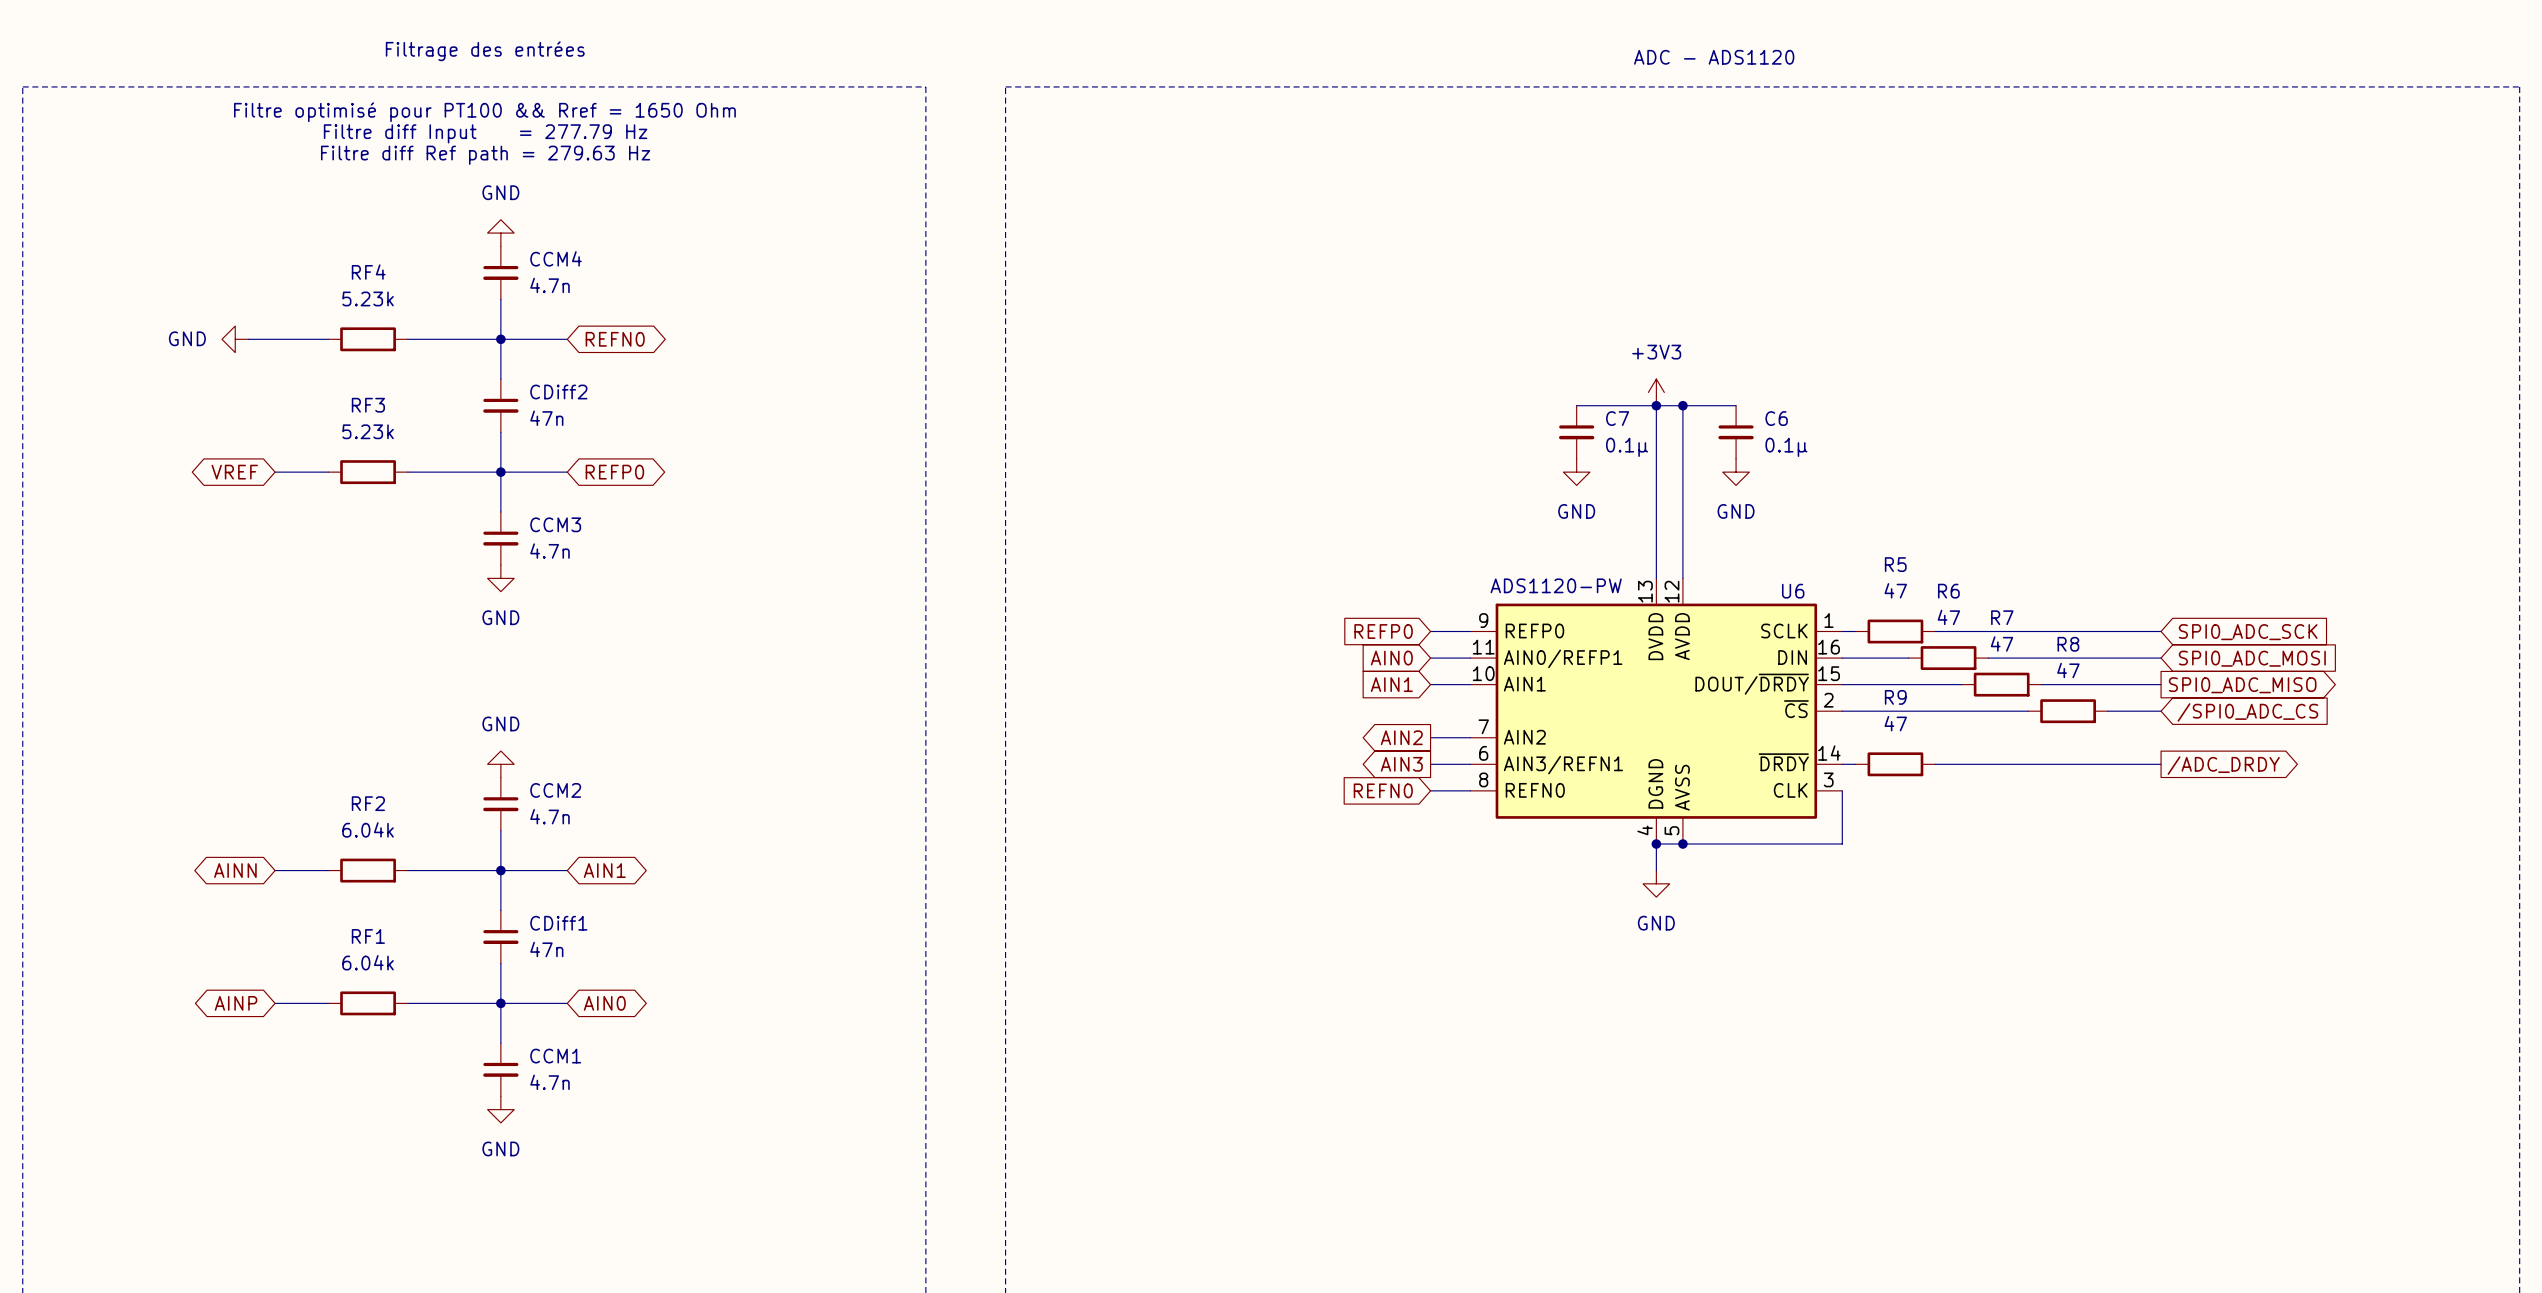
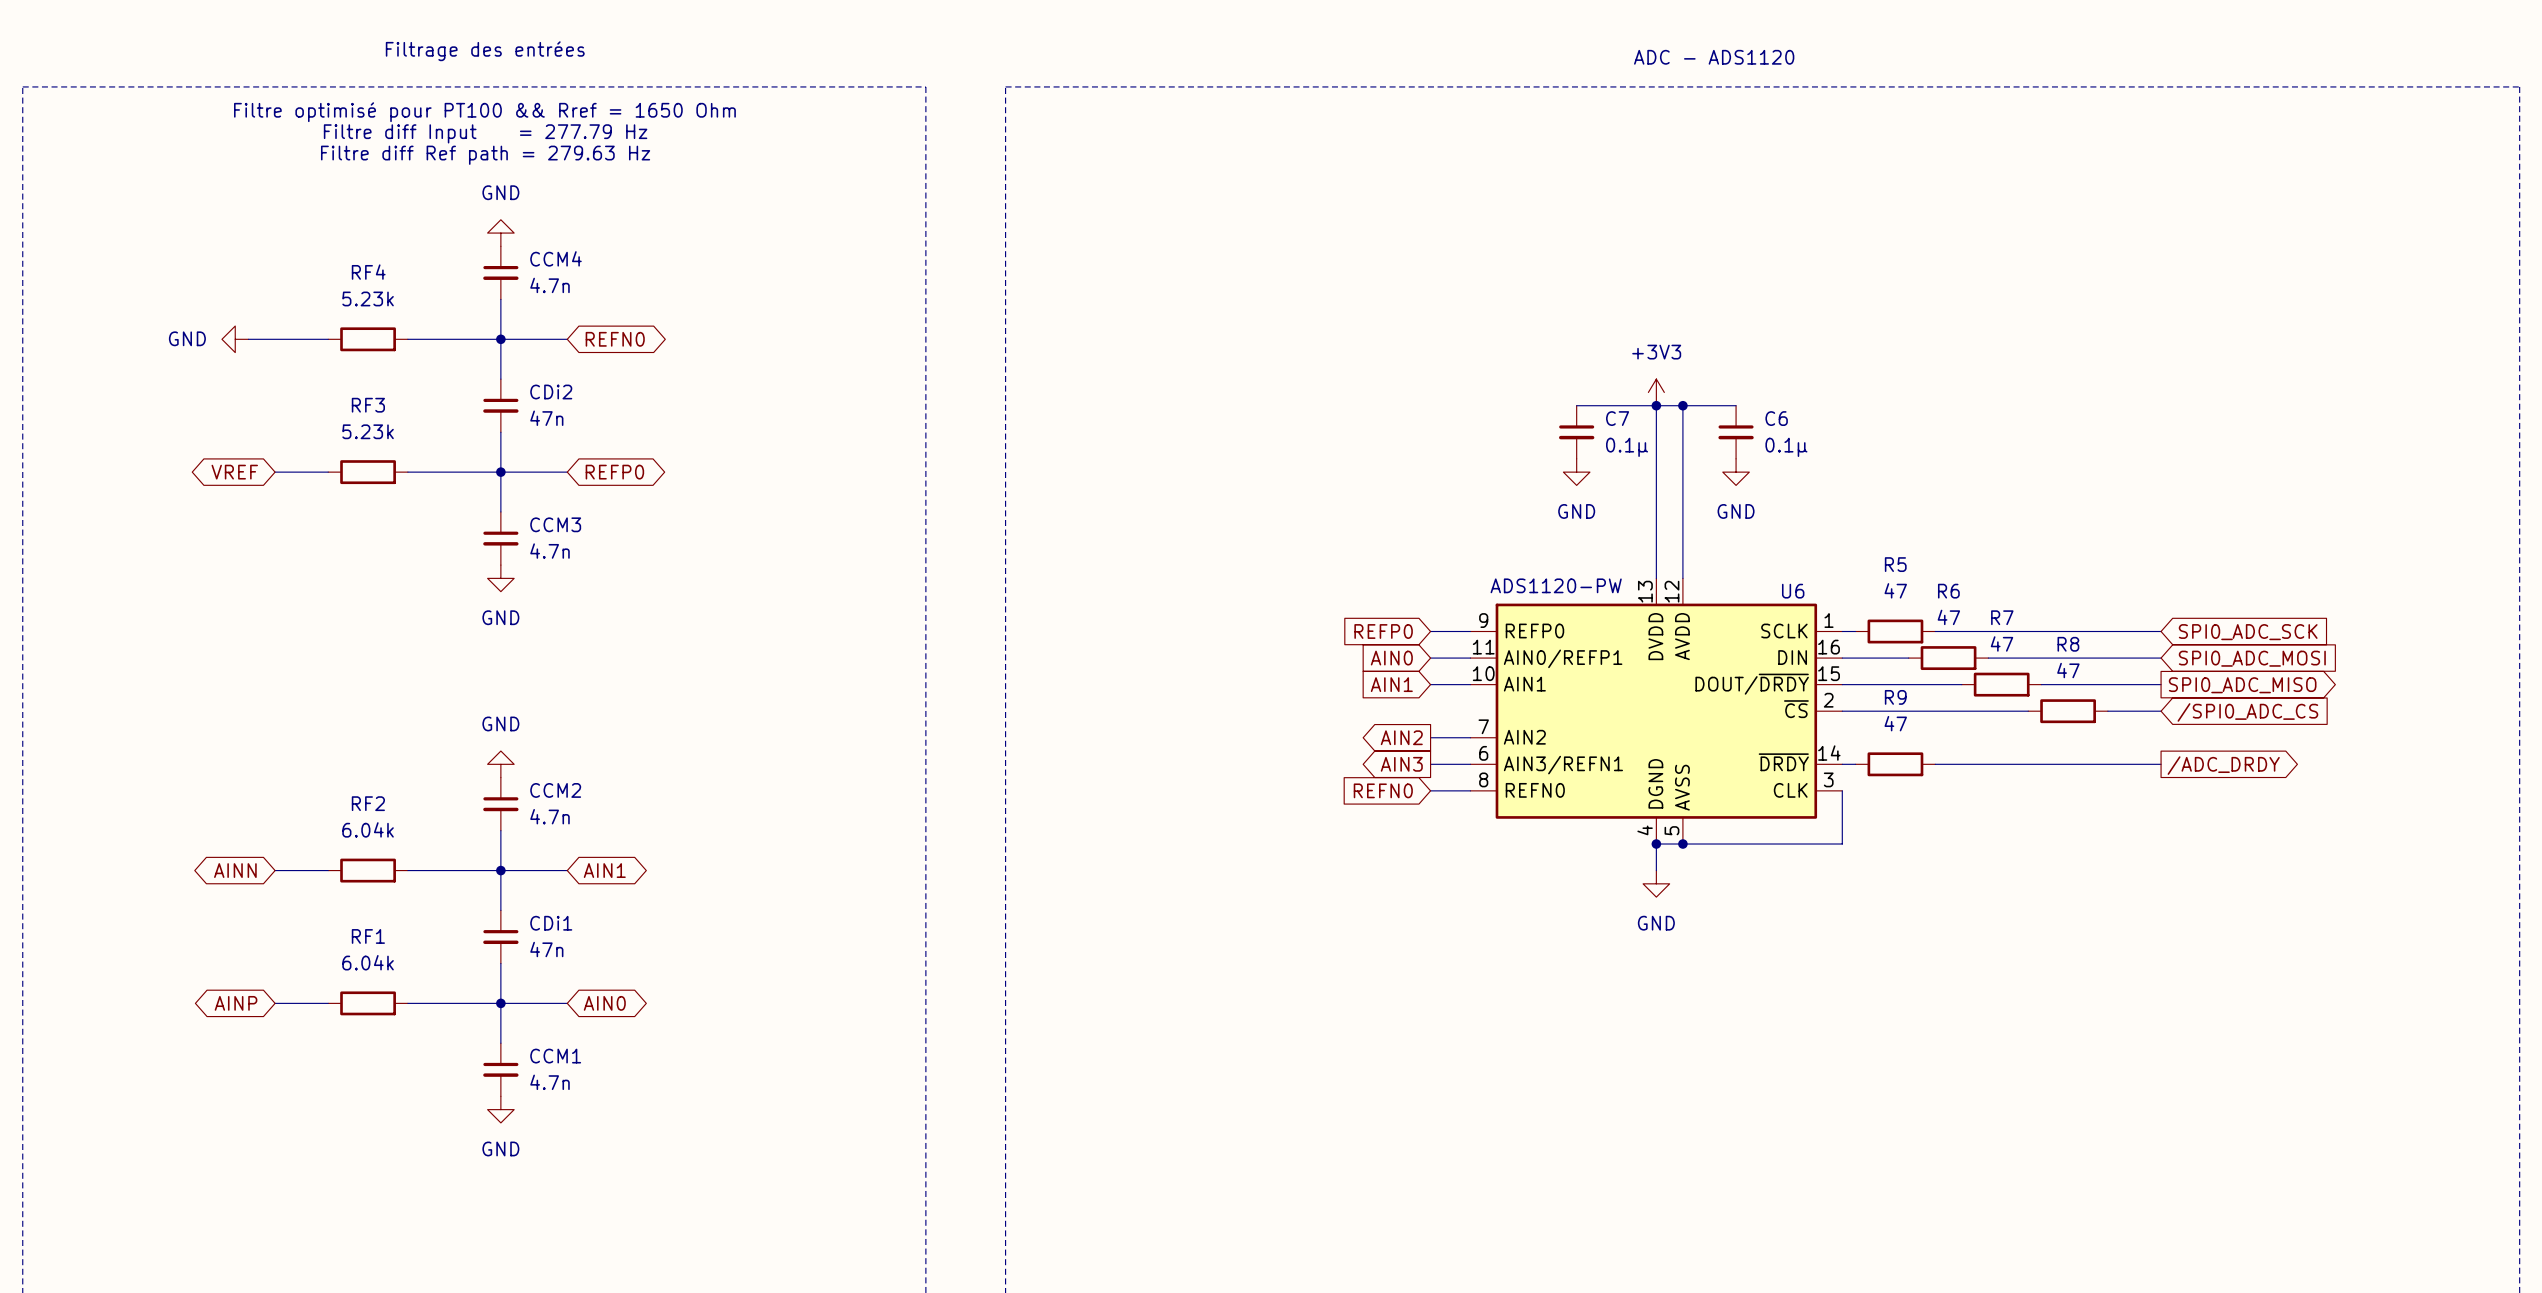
CDiff2 name: CDiff2 (558, 392) -> CDi2 (551, 392)
CDiff1 name: CDiff1 (558, 923) -> CDi1 (551, 923)

